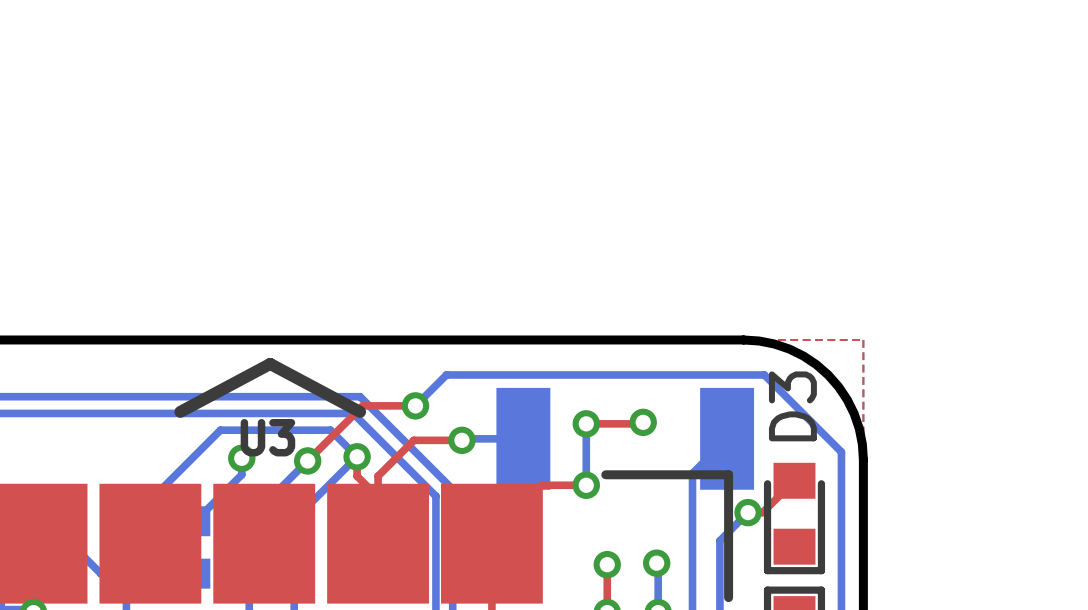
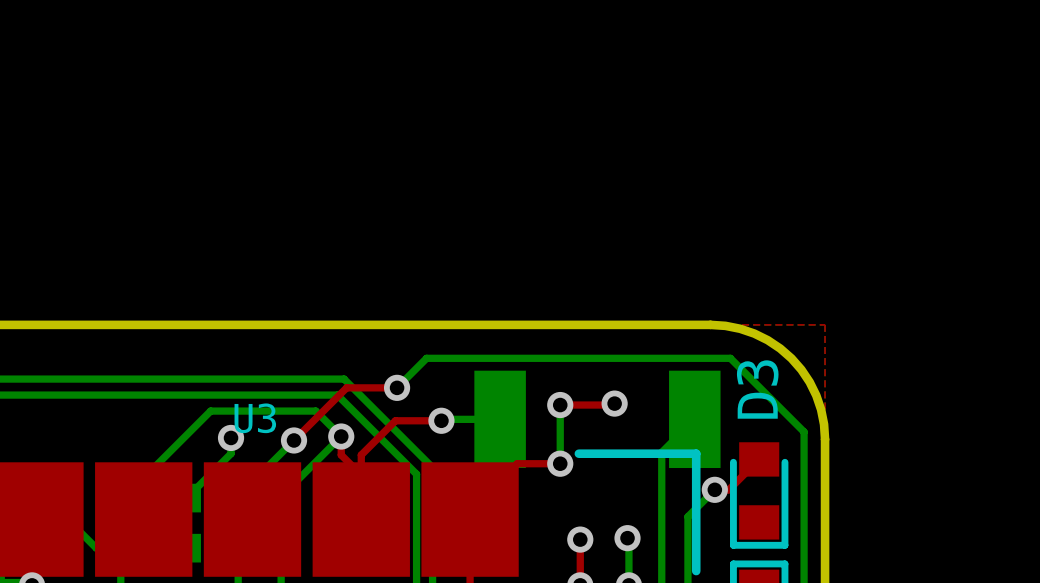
line: (180, 411) (270, 363) (360, 411) -> none

